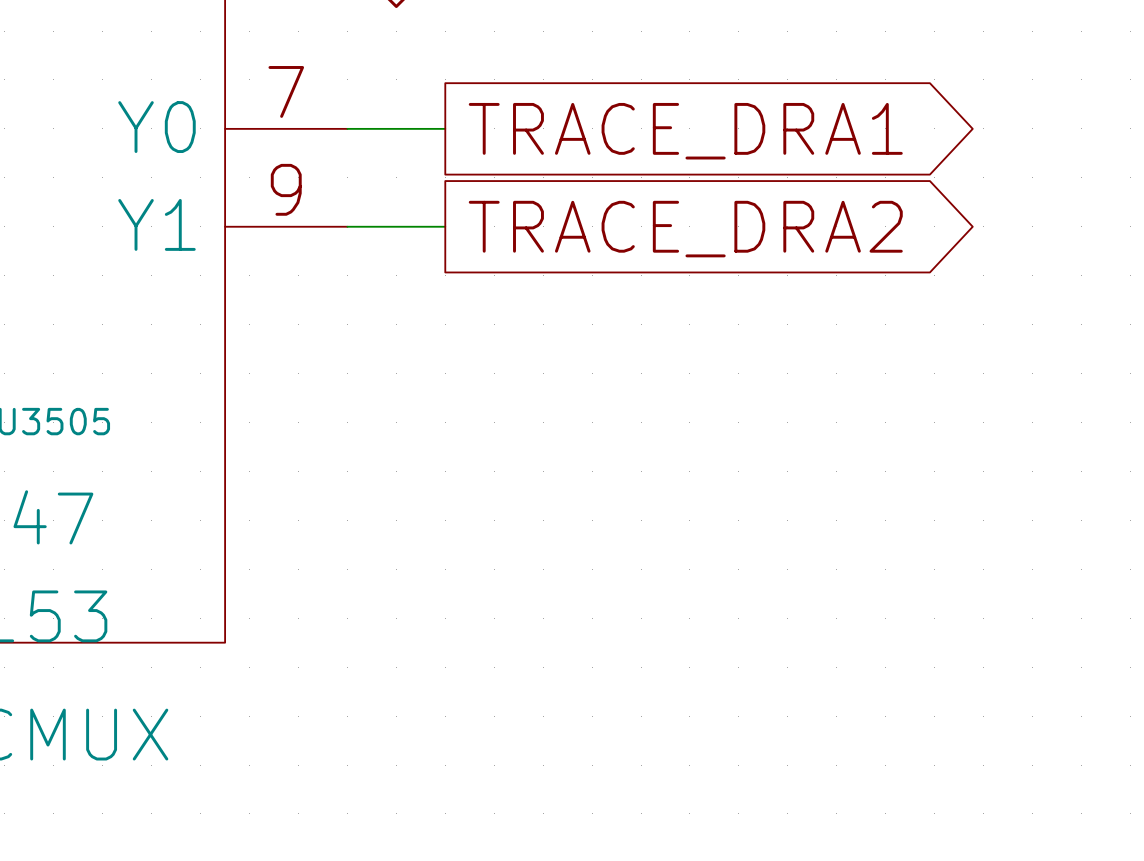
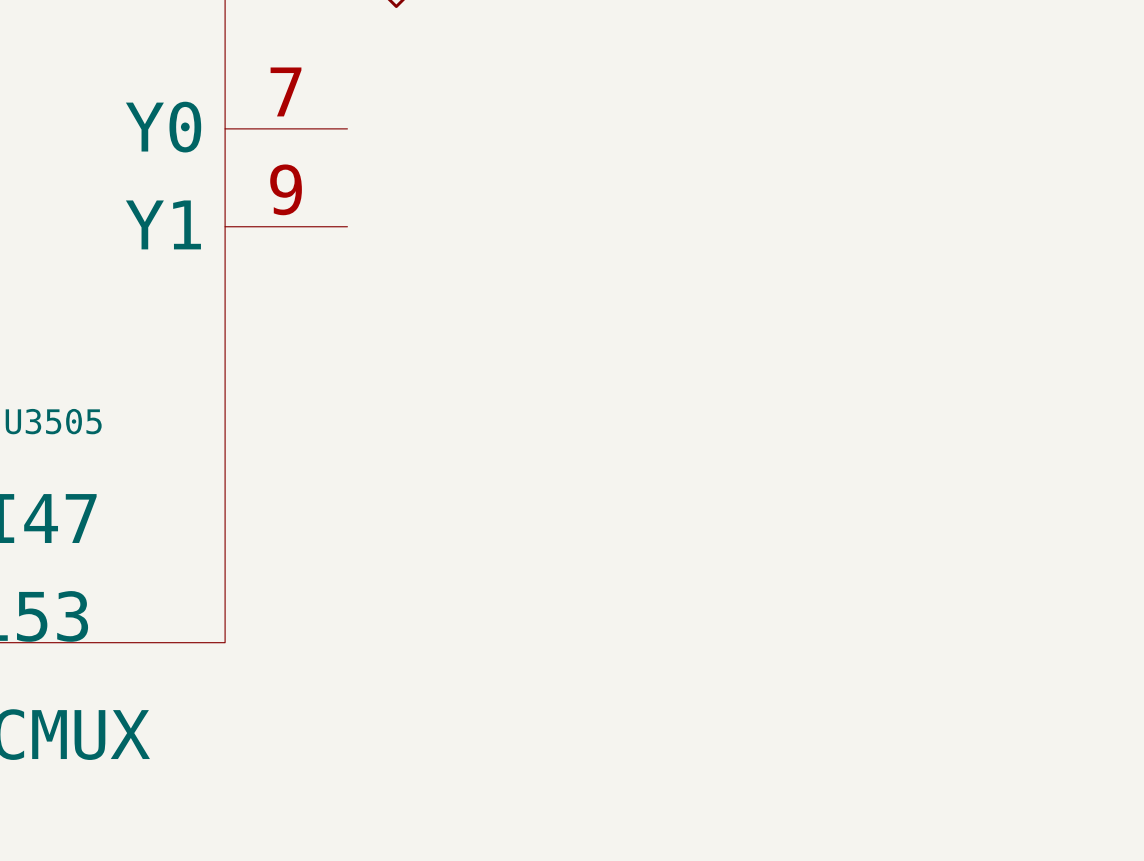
wire: (347, 128) (445, 128) -> none
global label: TRACE_DRA1 (685, 131) -> none
wire: (347, 226) (445, 226) -> none
global label: TRACE_DRA2 (685, 229) -> none

